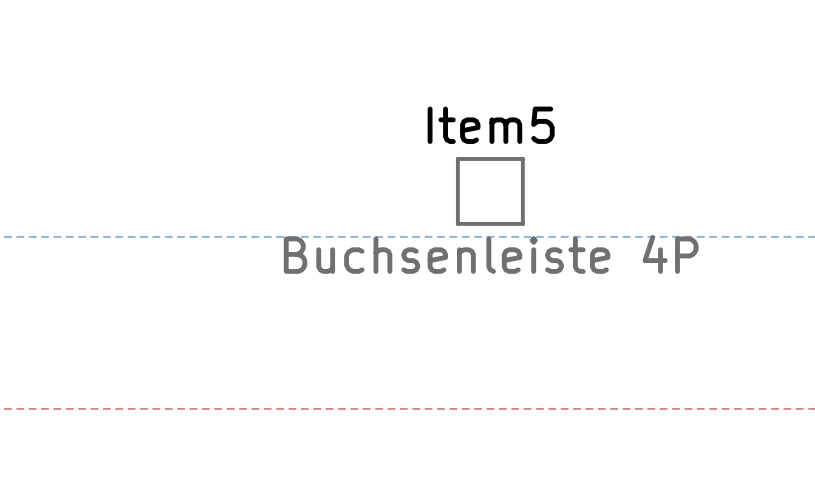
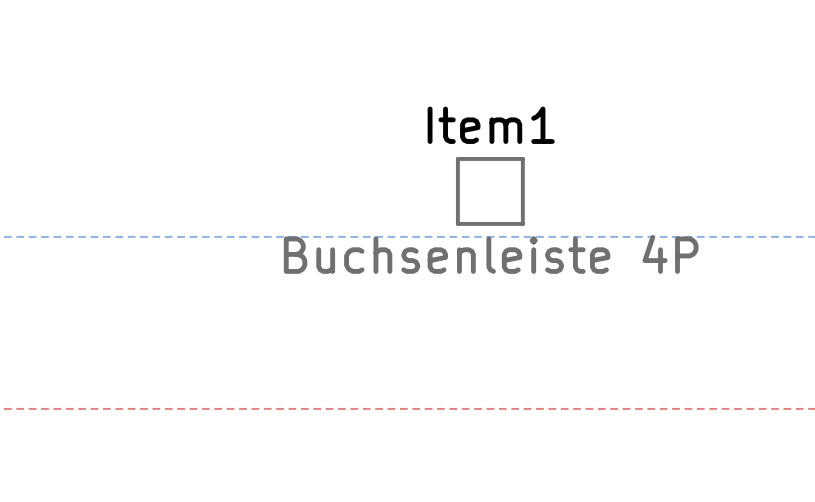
Item5 name: Item5 (491, 125) -> Item1 (491, 125)

